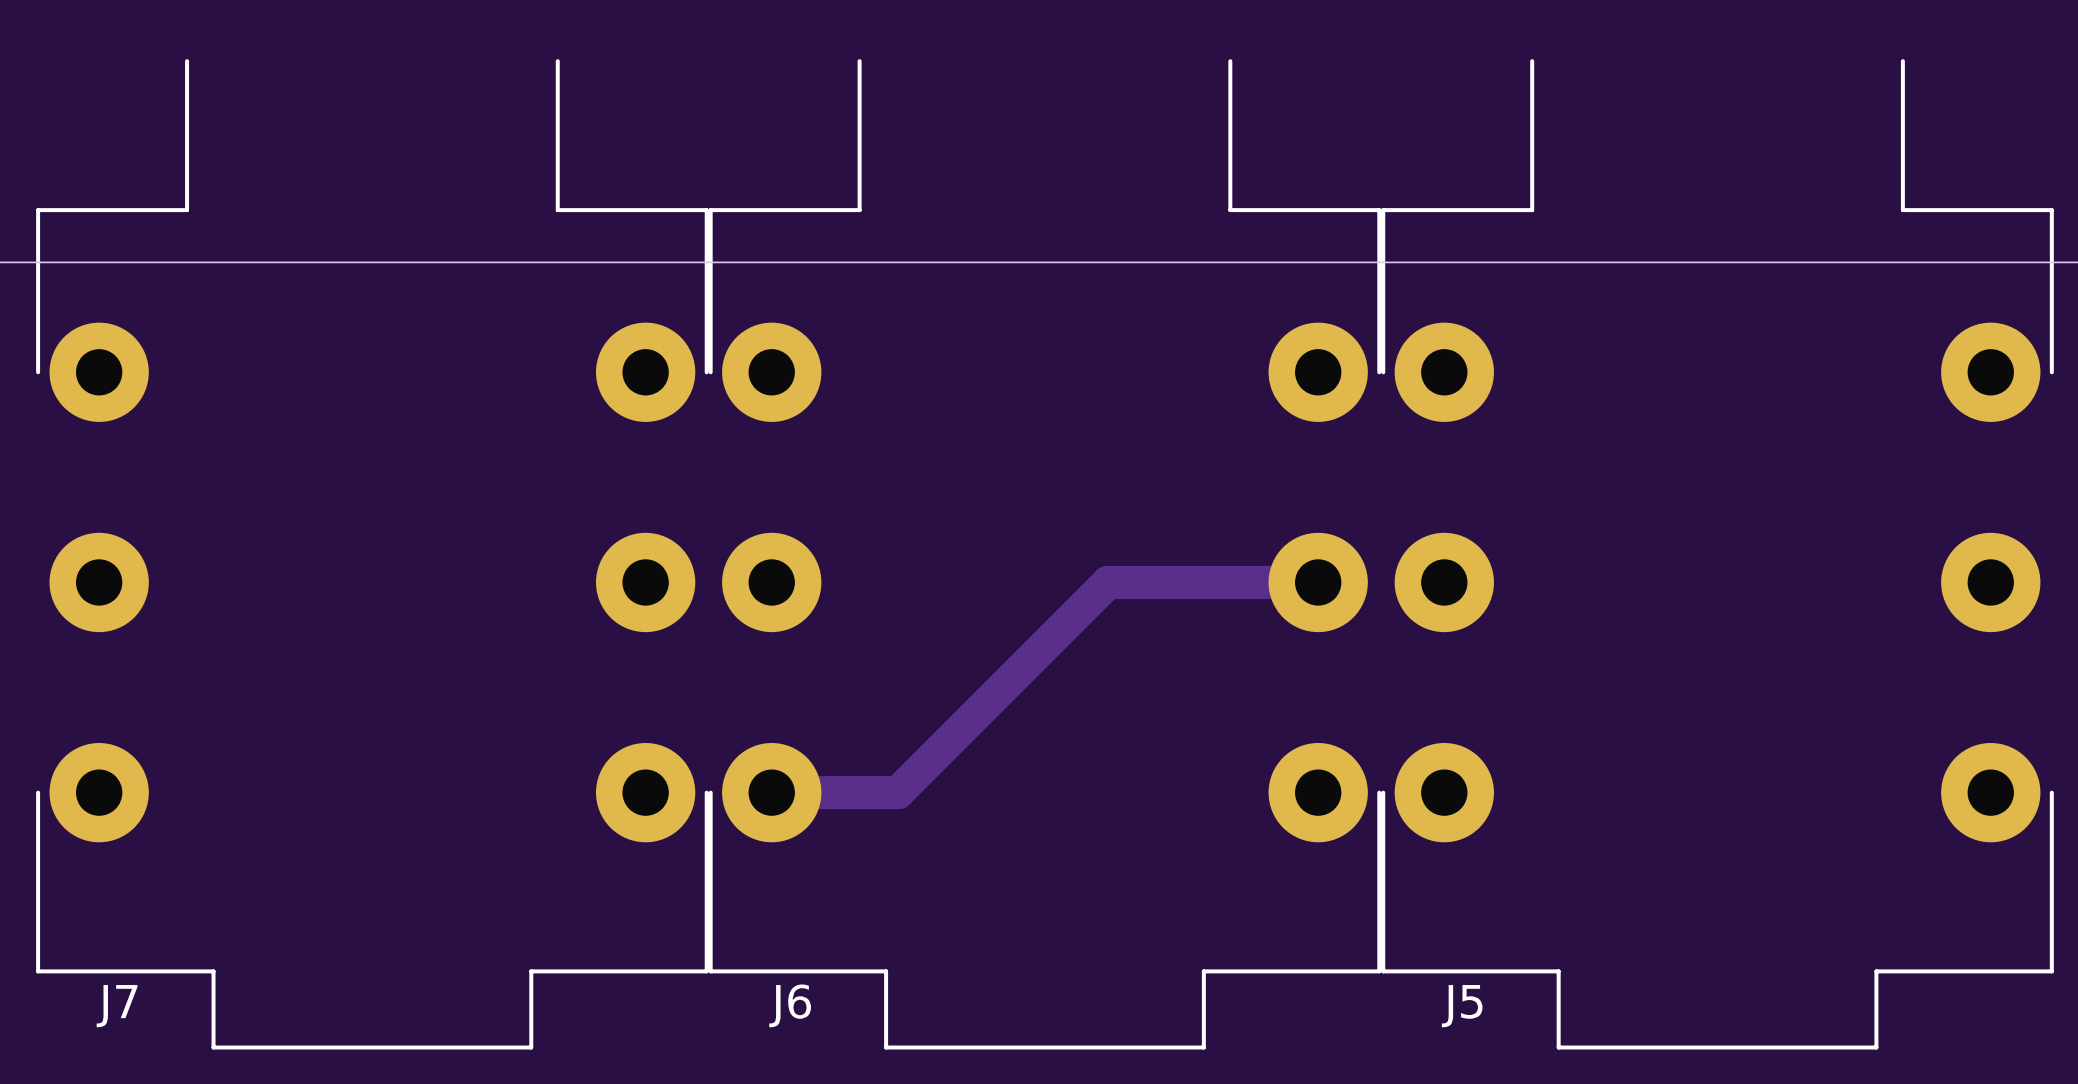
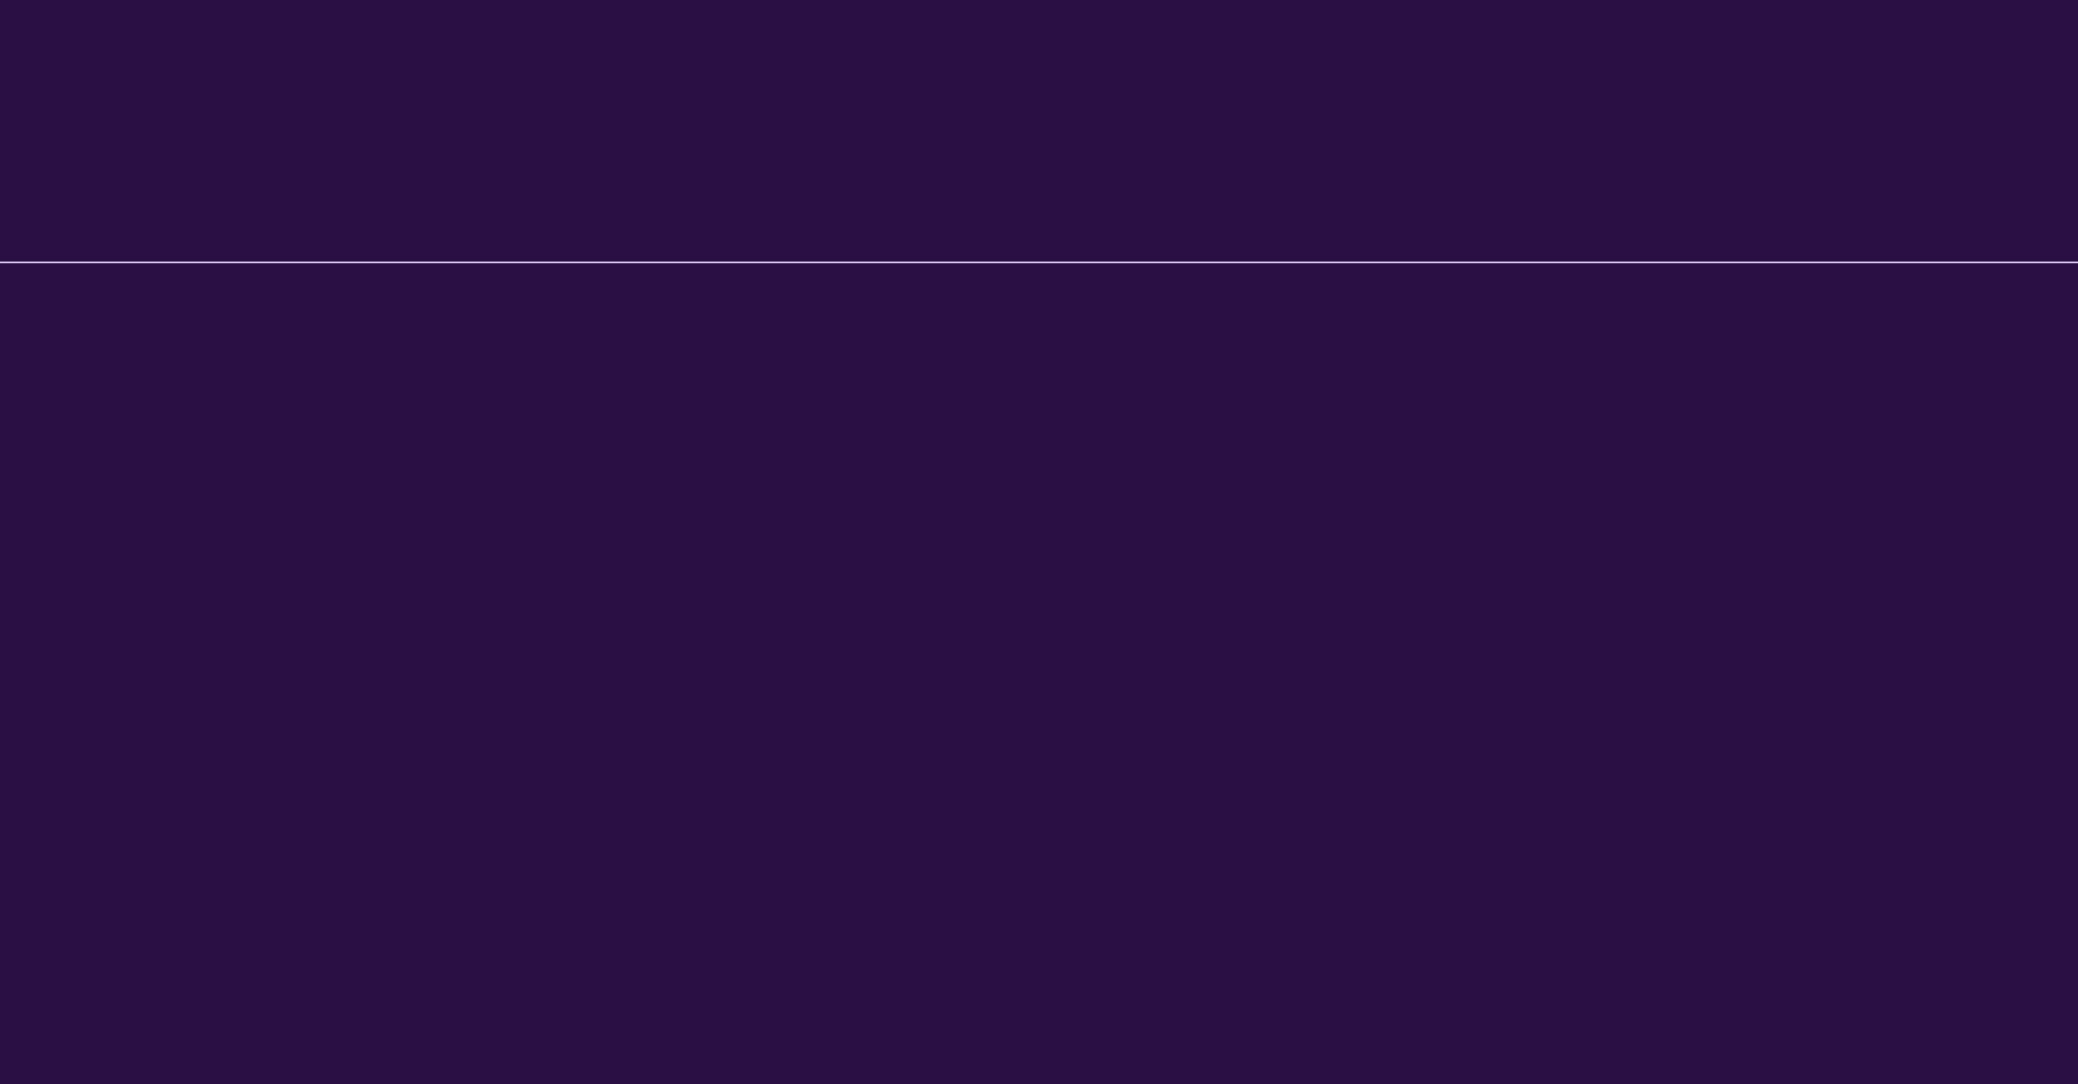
J7: (372, 554) -> none
J6: (1044, 554) -> none
J5: (1717, 554) -> none
track: (1318, 582) (1108, 582) (897, 792) (771, 792) -> none

